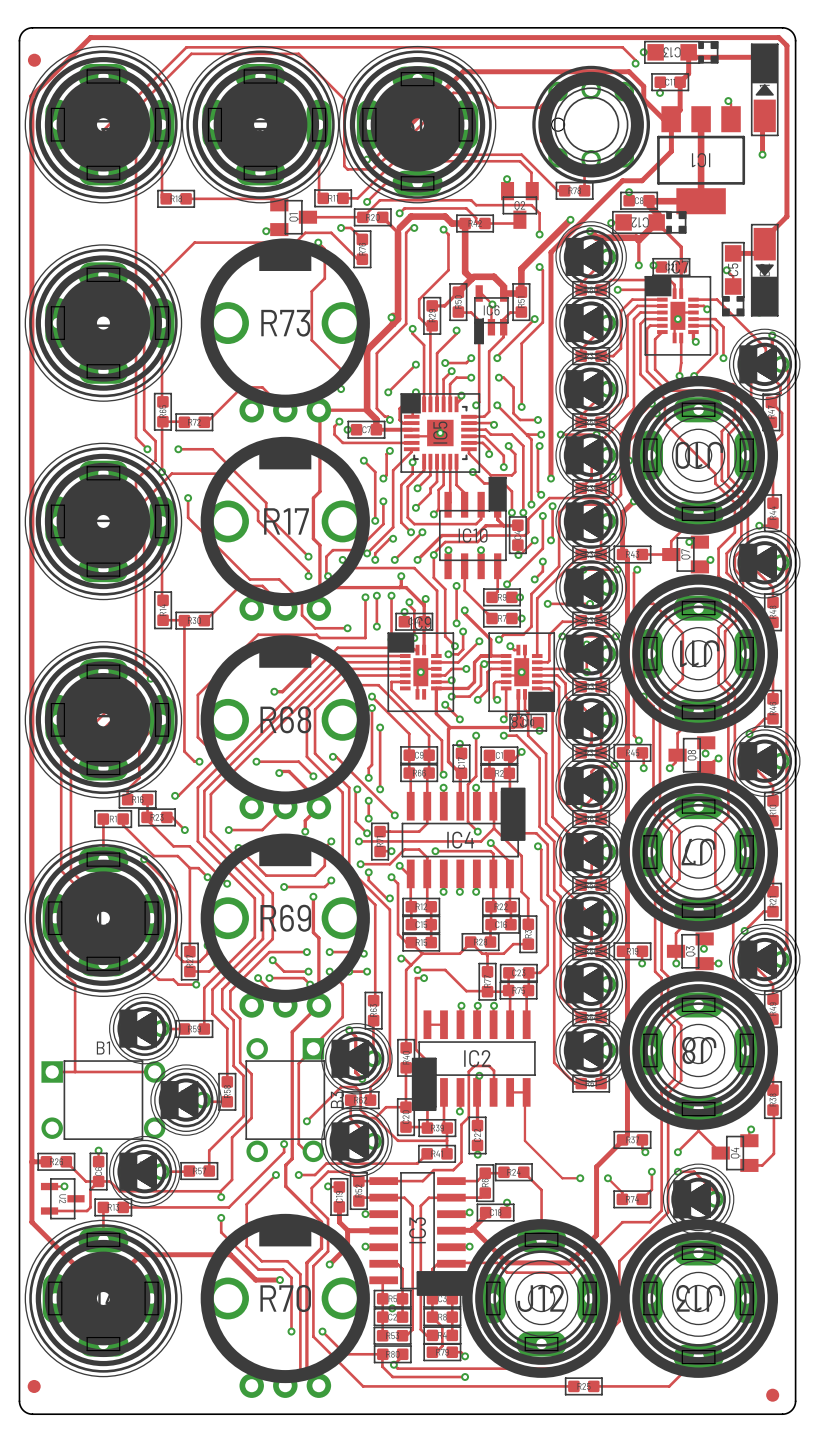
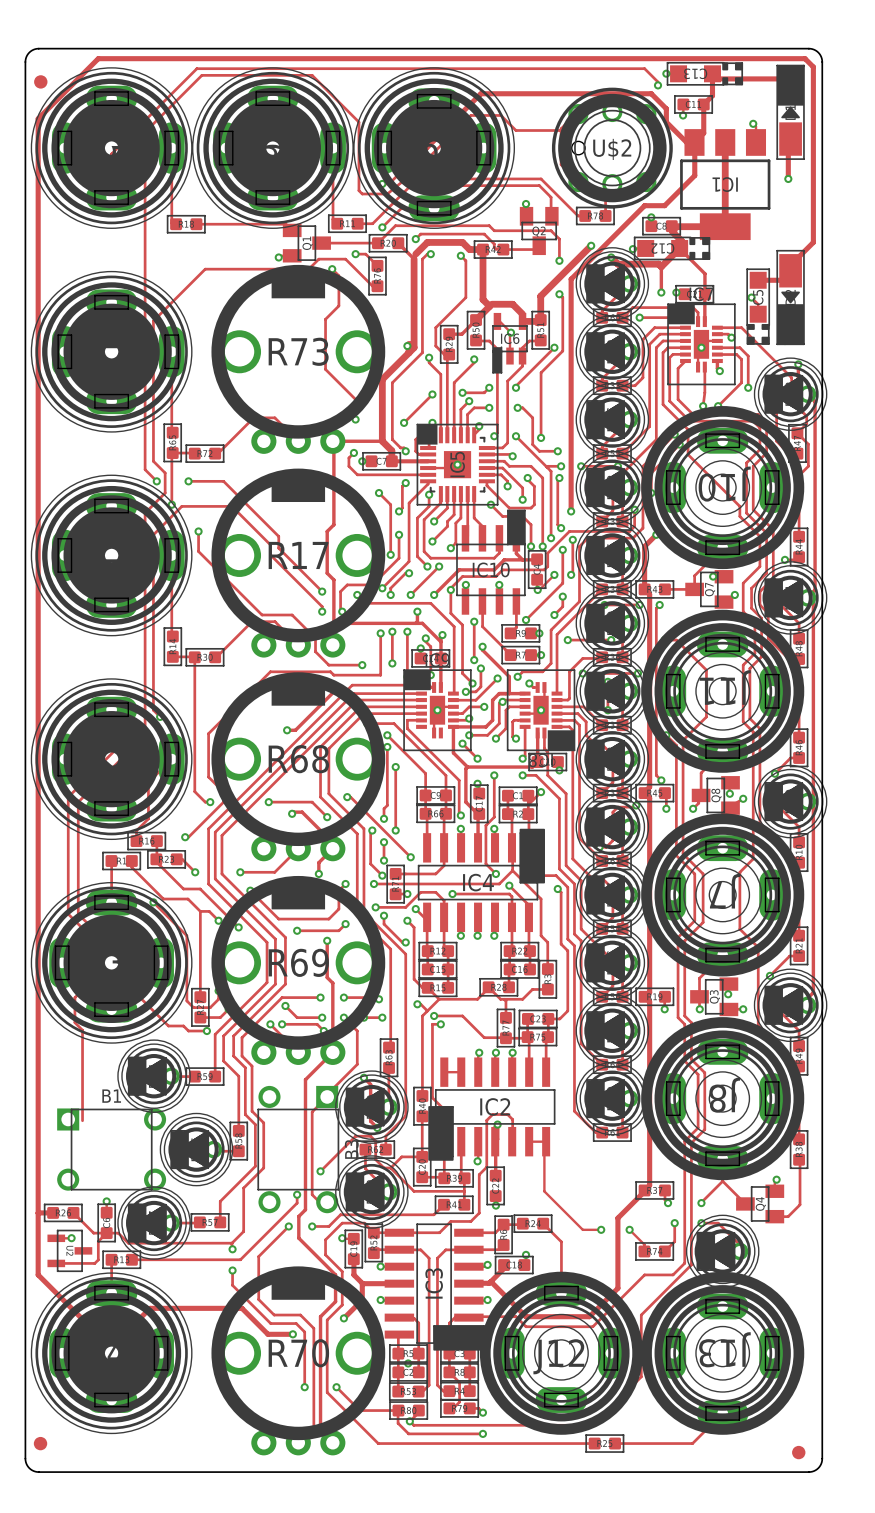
U$2 name: none -> U$2 (612, 149)
B1 footprint: [41, 1060, 166, 1140] -> [57, 1108, 167, 1191]
track: (52, 1071) (154, 1071) -> none

